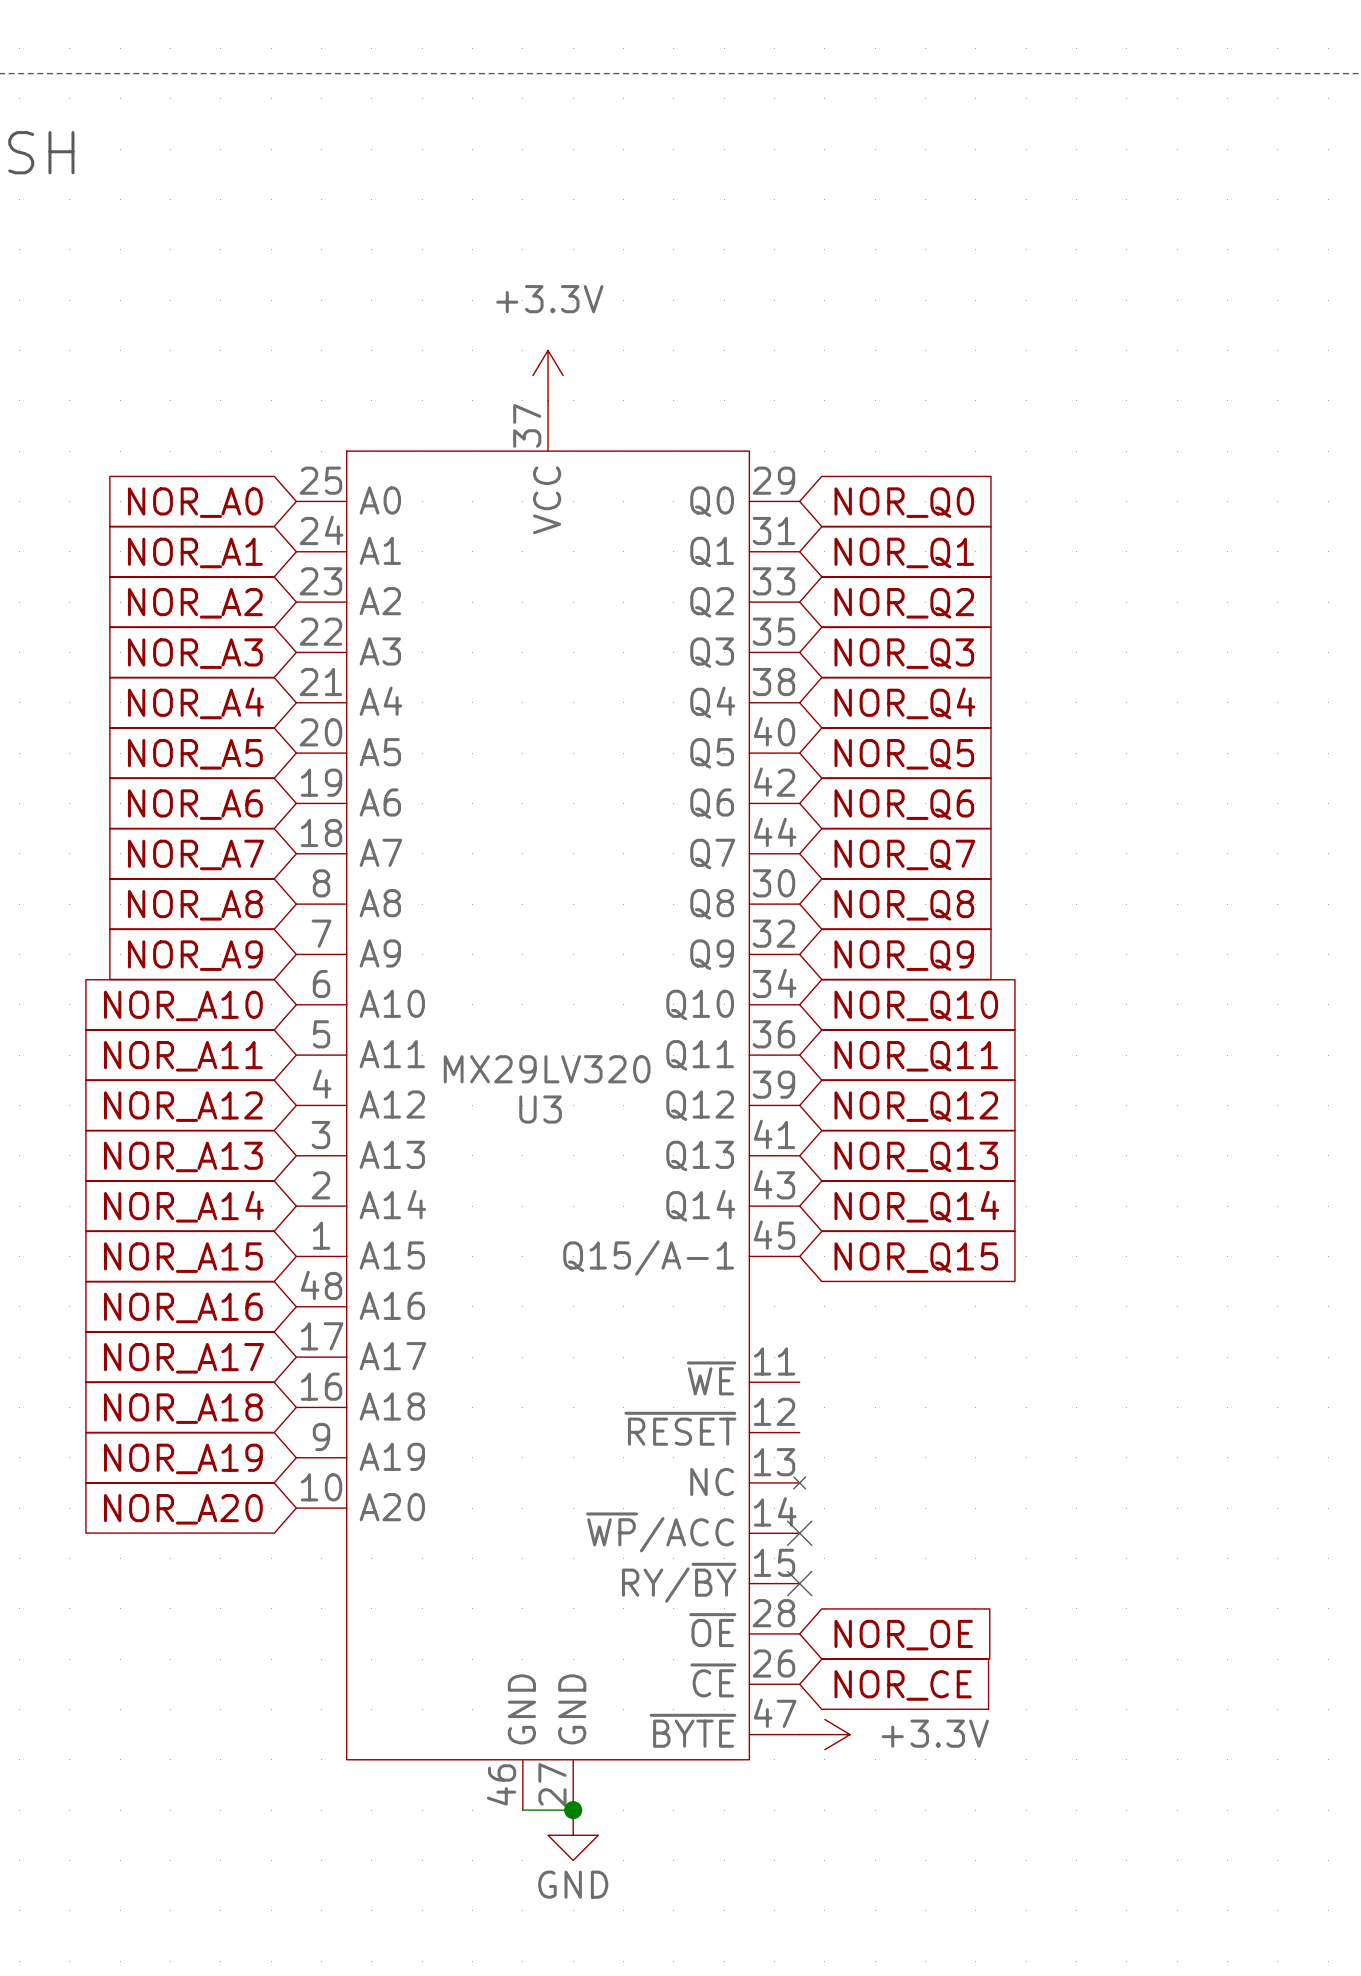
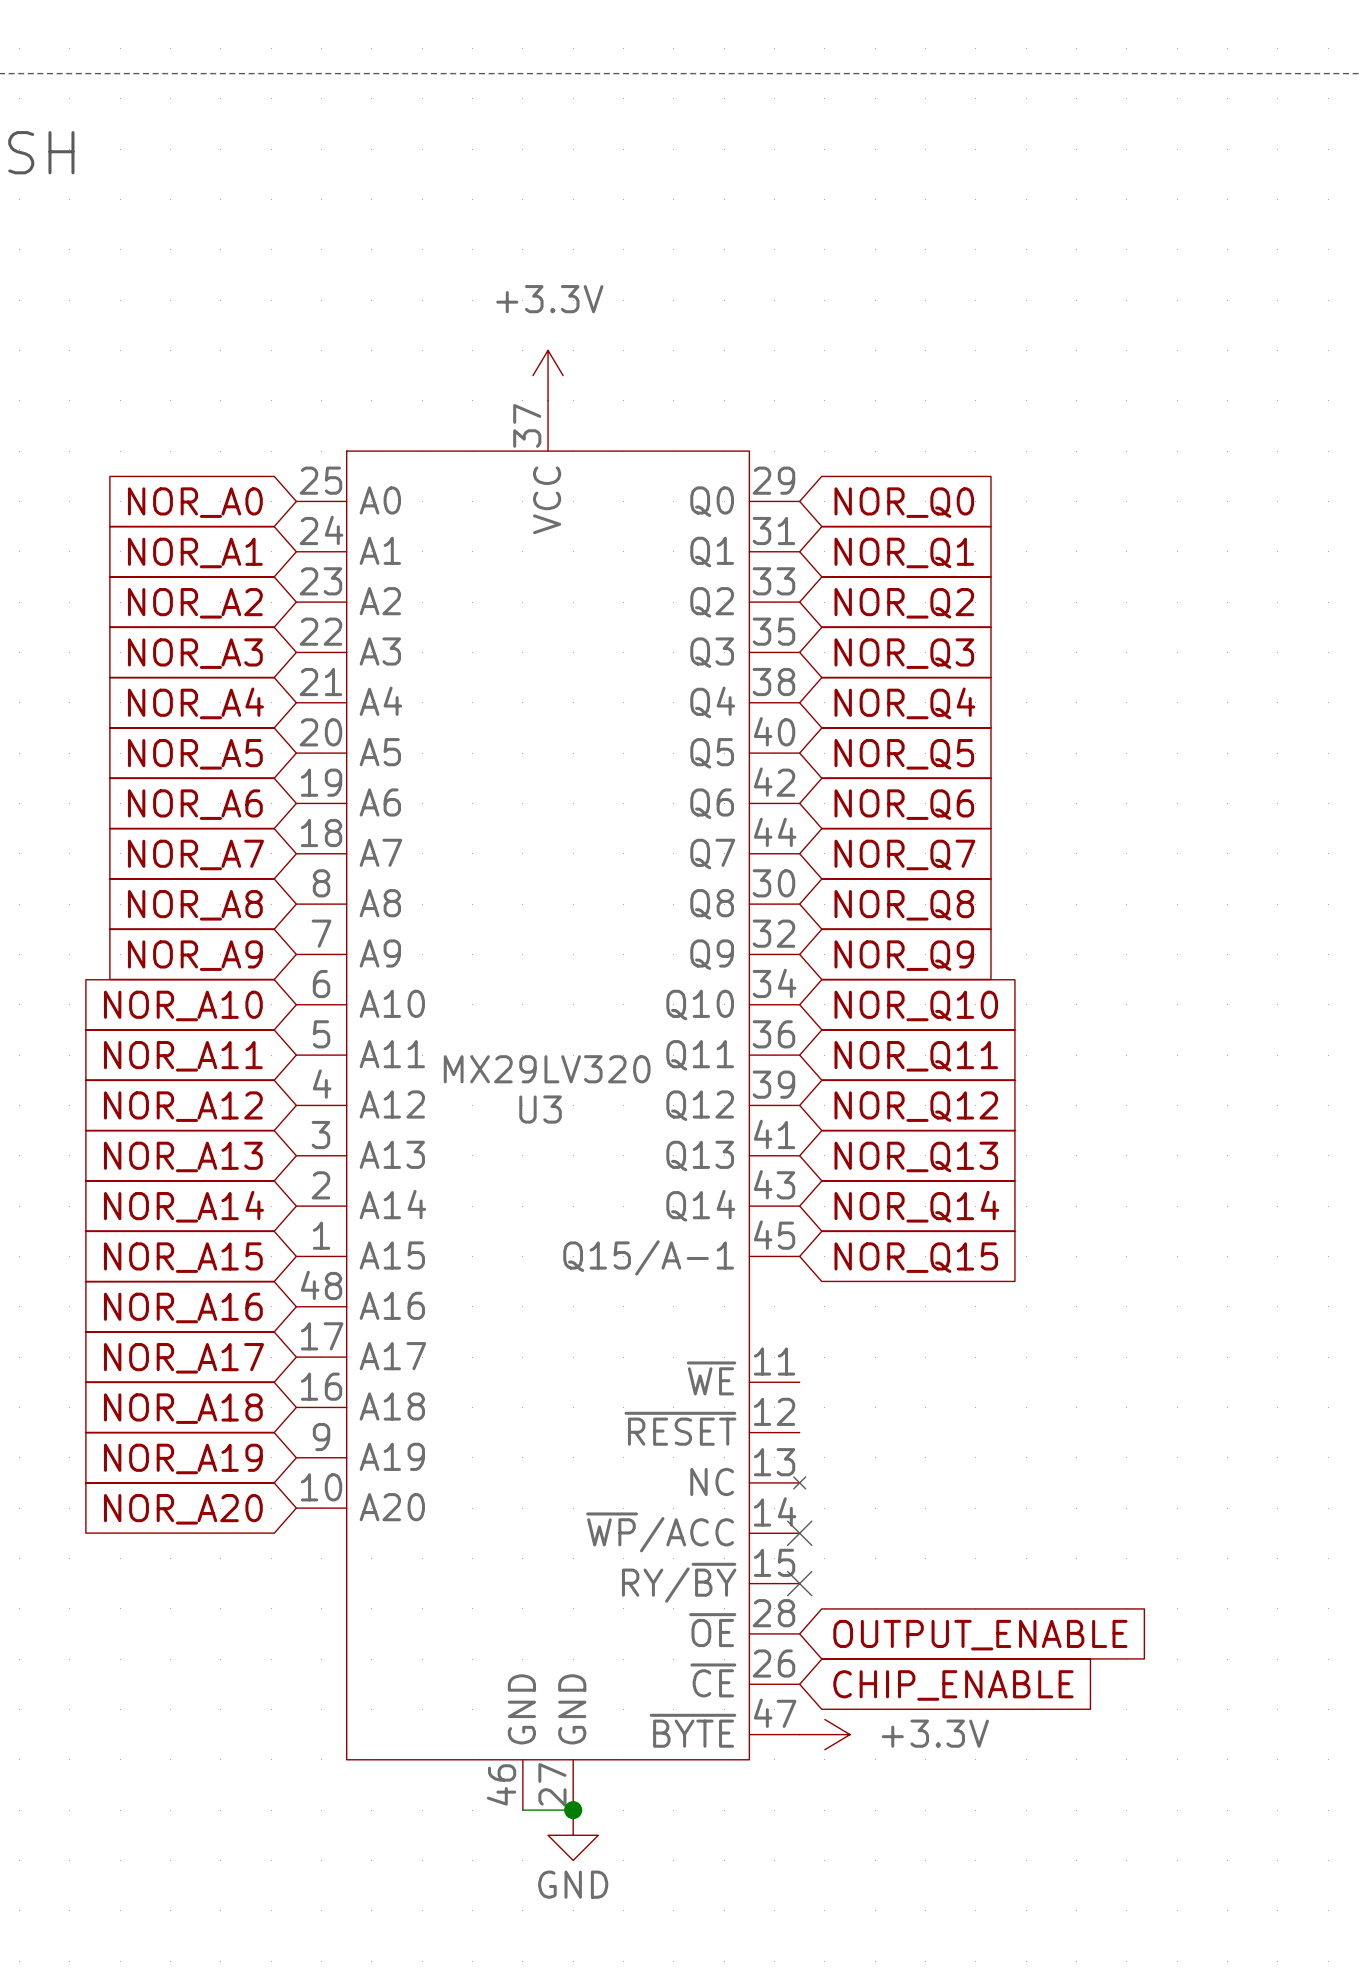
global label: NOR_OE (903, 1635) -> OUTPUT_ENABLE (980, 1635)
global label: NOR_CE (903, 1685) -> CHIP_ENABLE (953, 1685)

